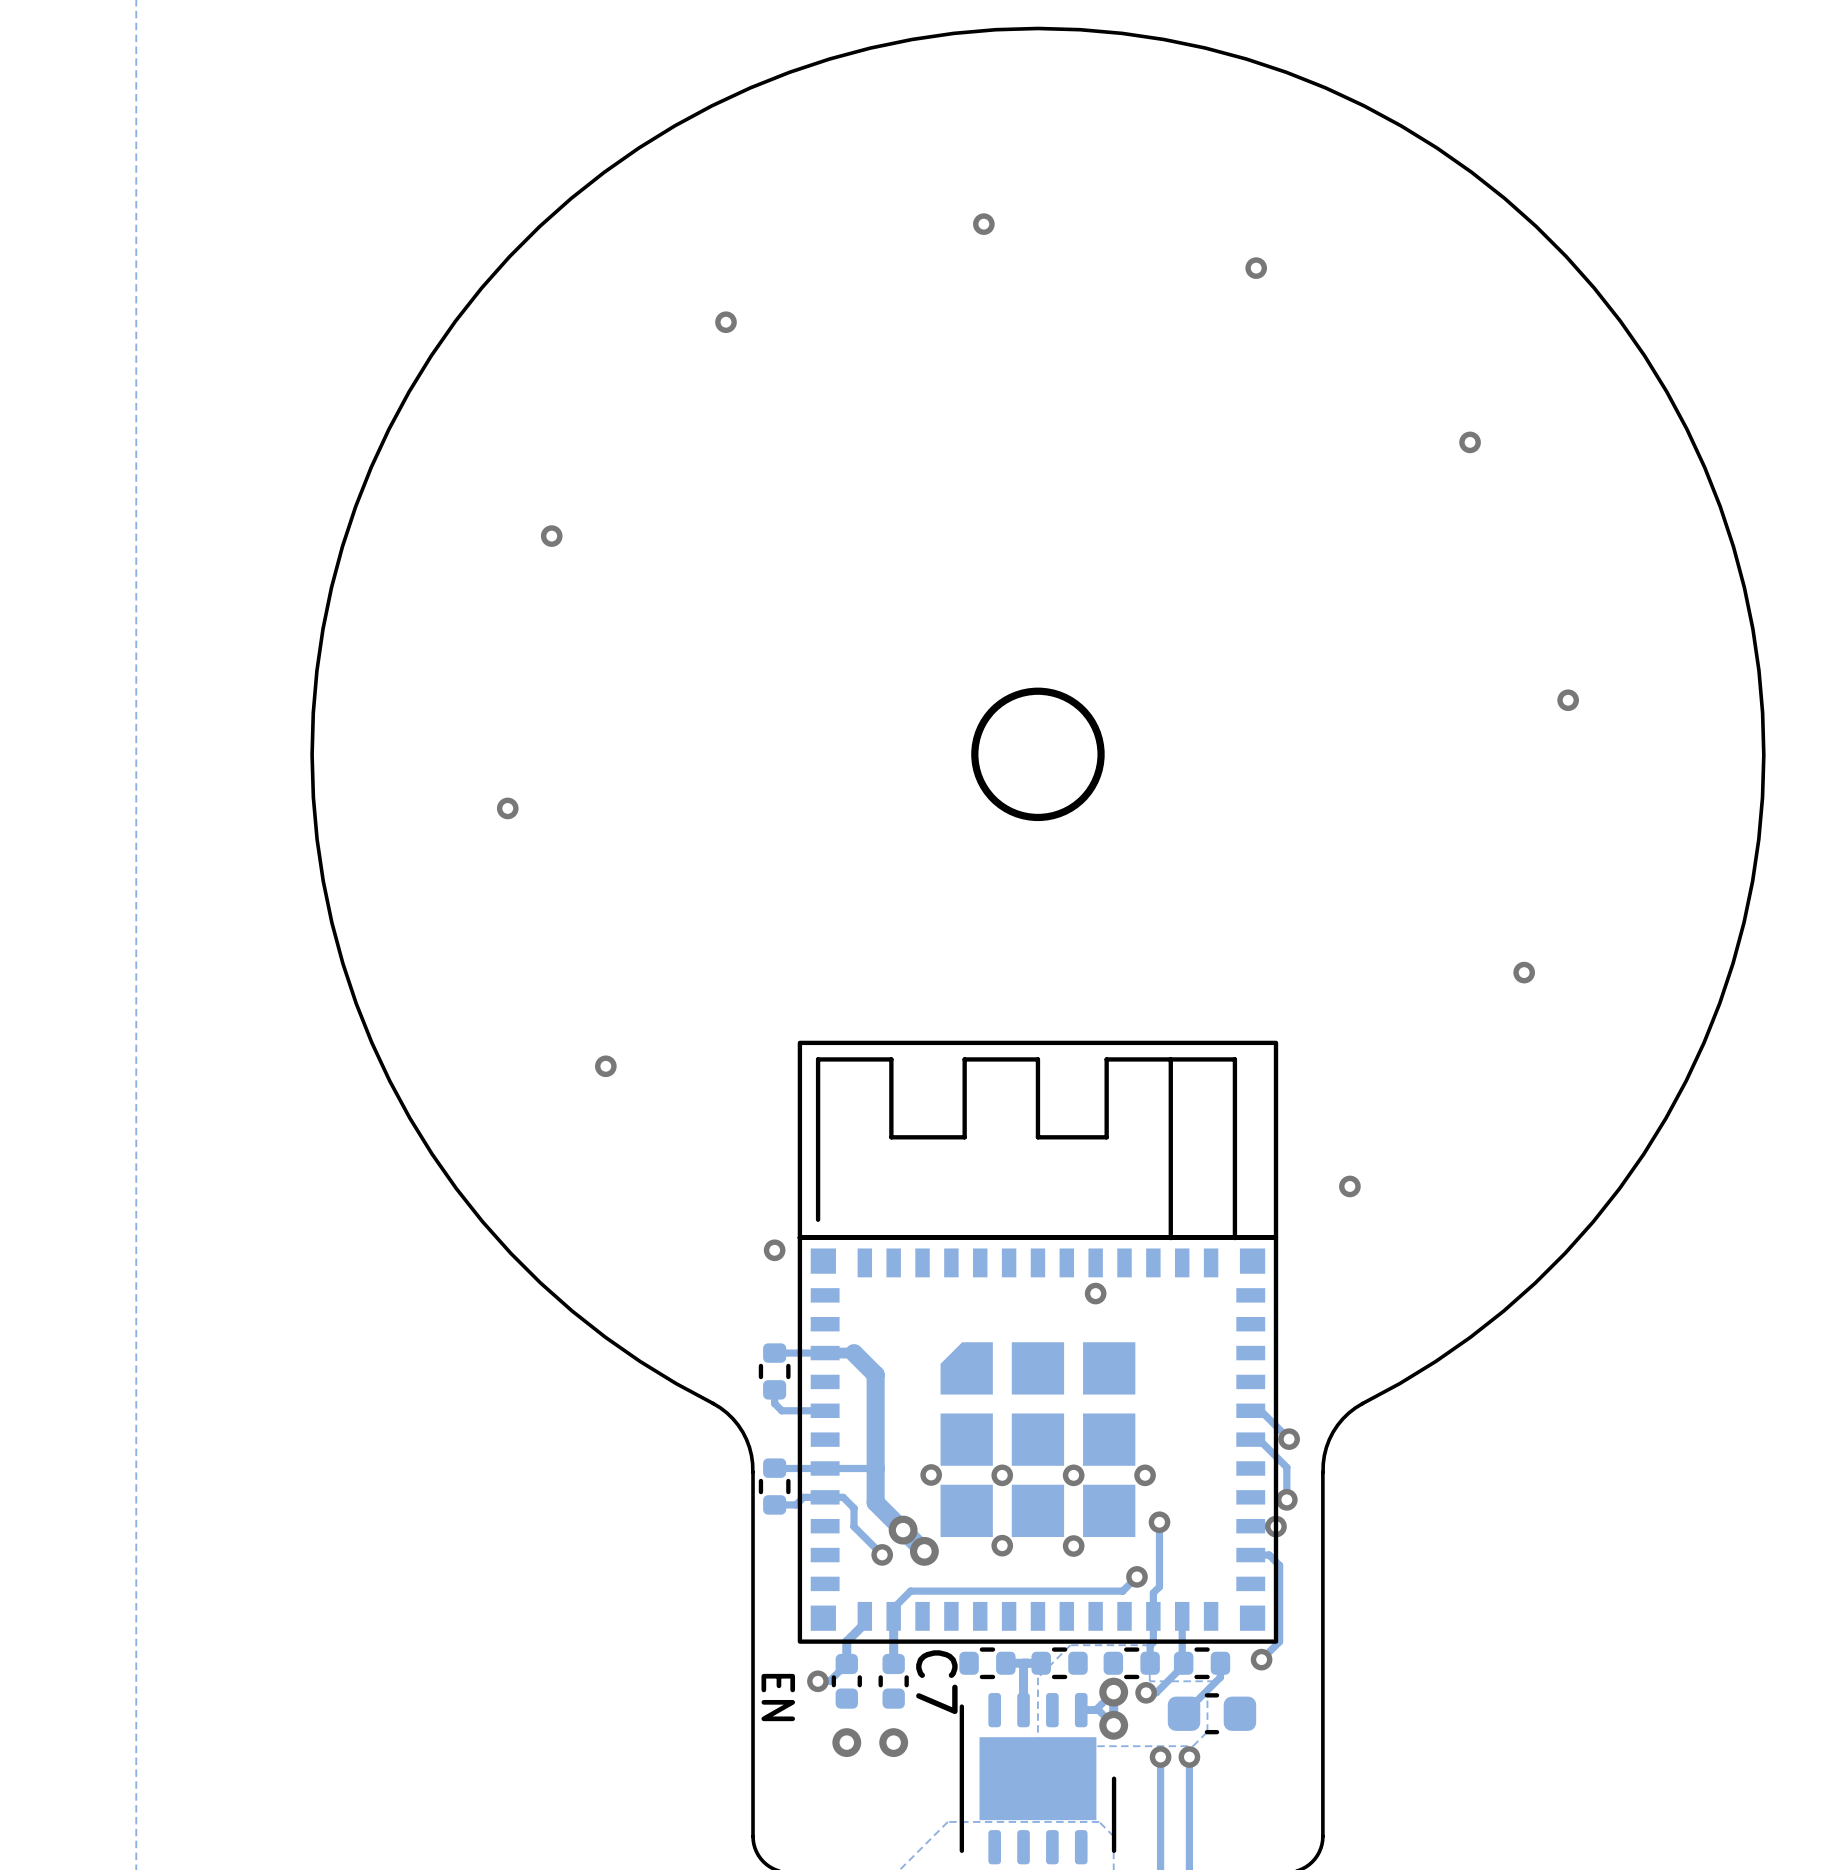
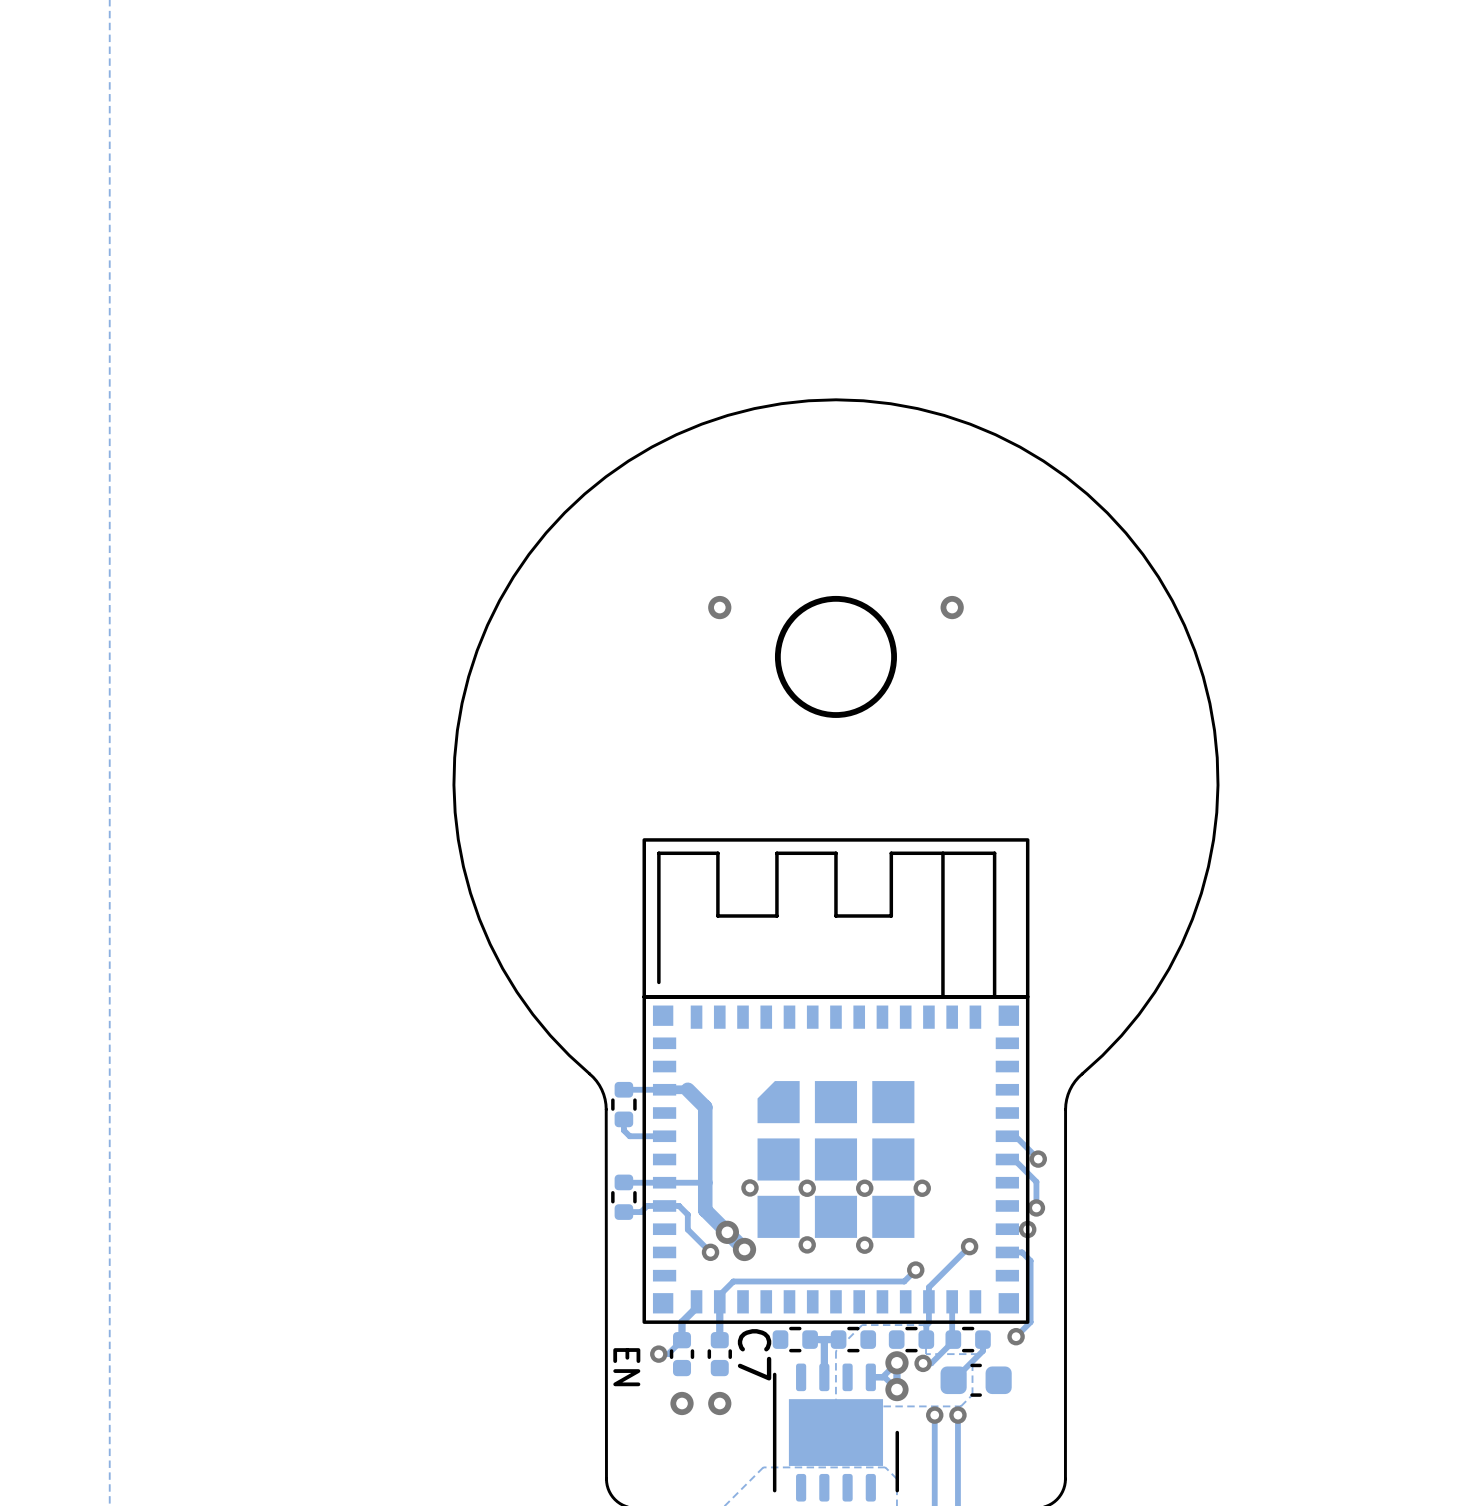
via: (983, 224) -> none
via: (1256, 268) -> none
via: (725, 322) -> none
via: (1470, 442) -> none
via: (551, 536) -> none
round board edge: [971, 687, 1105, 822] -> none
via: (1568, 700) -> none
round board edge: none -> [774, 595, 897, 718]
via: none -> (719, 607)
via: none -> (952, 607)
via: (507, 808) -> none
via: (1524, 972) -> none
via: (605, 1066) -> none
via: (1349, 1186) -> none
via: (774, 1250) -> none
via: (1095, 1293) -> none
track: (1159, 1522) (1159, 1586) (1153, 1592) (1153, 1598) -> (969, 1246) (928, 1287)
via position: (1159, 1522) -> (969, 1246)
board edge: (1322, 1836) (1322, 1472) (1326, 1447) (1333, 1432) (1348, 1413) (1435, 1361) (1470, 1337) (1503, 1311) (1565, 1253) (1619, 1188) (1666, 1118) (1686, 1080) (1719, 1003) (1733, 963) (1744, 922) (1758, 839) (1763, 755) (1758, 670) (1752, 628) (1733, 546) (1720, 506) (1686, 429) (1666, 391) (1620, 321) (1594, 288) (1536, 226) (1504, 198) (1471, 172) (1401, 125) (1363, 105) (1286, 72) (1205, 48) (1164, 39) (1080, 29) (1037, 28) (995, 29) (911, 39) (870, 48) (789, 72) (711, 105) (674, 125) (638, 148) (571, 198) (509, 256) (481, 288) (431, 355) (409, 391) (389, 429) (355, 506) (342, 546) (323, 628) (313, 712) (312, 755) (313, 797) (323, 881) (331, 922) (356, 1003) (389, 1080) (409, 1118) (456, 1188) (510, 1253) (572, 1311) (605, 1337) (640, 1361) (727, 1413) (738, 1425) (749, 1447) (752, 1472) (753, 1836) -> (1065, 1479) (1066, 1099) (1075, 1081) (1121, 1035) (1154, 992) (1169, 968) (1192, 919) (1208, 866) (1216, 812) (1217, 757) (1209, 703) (1194, 650) (1172, 600) (1143, 554) (1107, 512) (1087, 494) (1043, 461) (995, 434) (970, 424) (917, 408) (863, 400) (836, 399) (781, 403) (754, 408) (701, 424) (652, 446) (606, 476) (584, 494) (546, 532) (513, 576) (487, 625) (468, 676) (462, 703) (454, 757) (455, 812) (463, 866) (479, 919) (502, 968) (516, 992) (550, 1035) (596, 1081) (605, 1099) (606, 1479)

